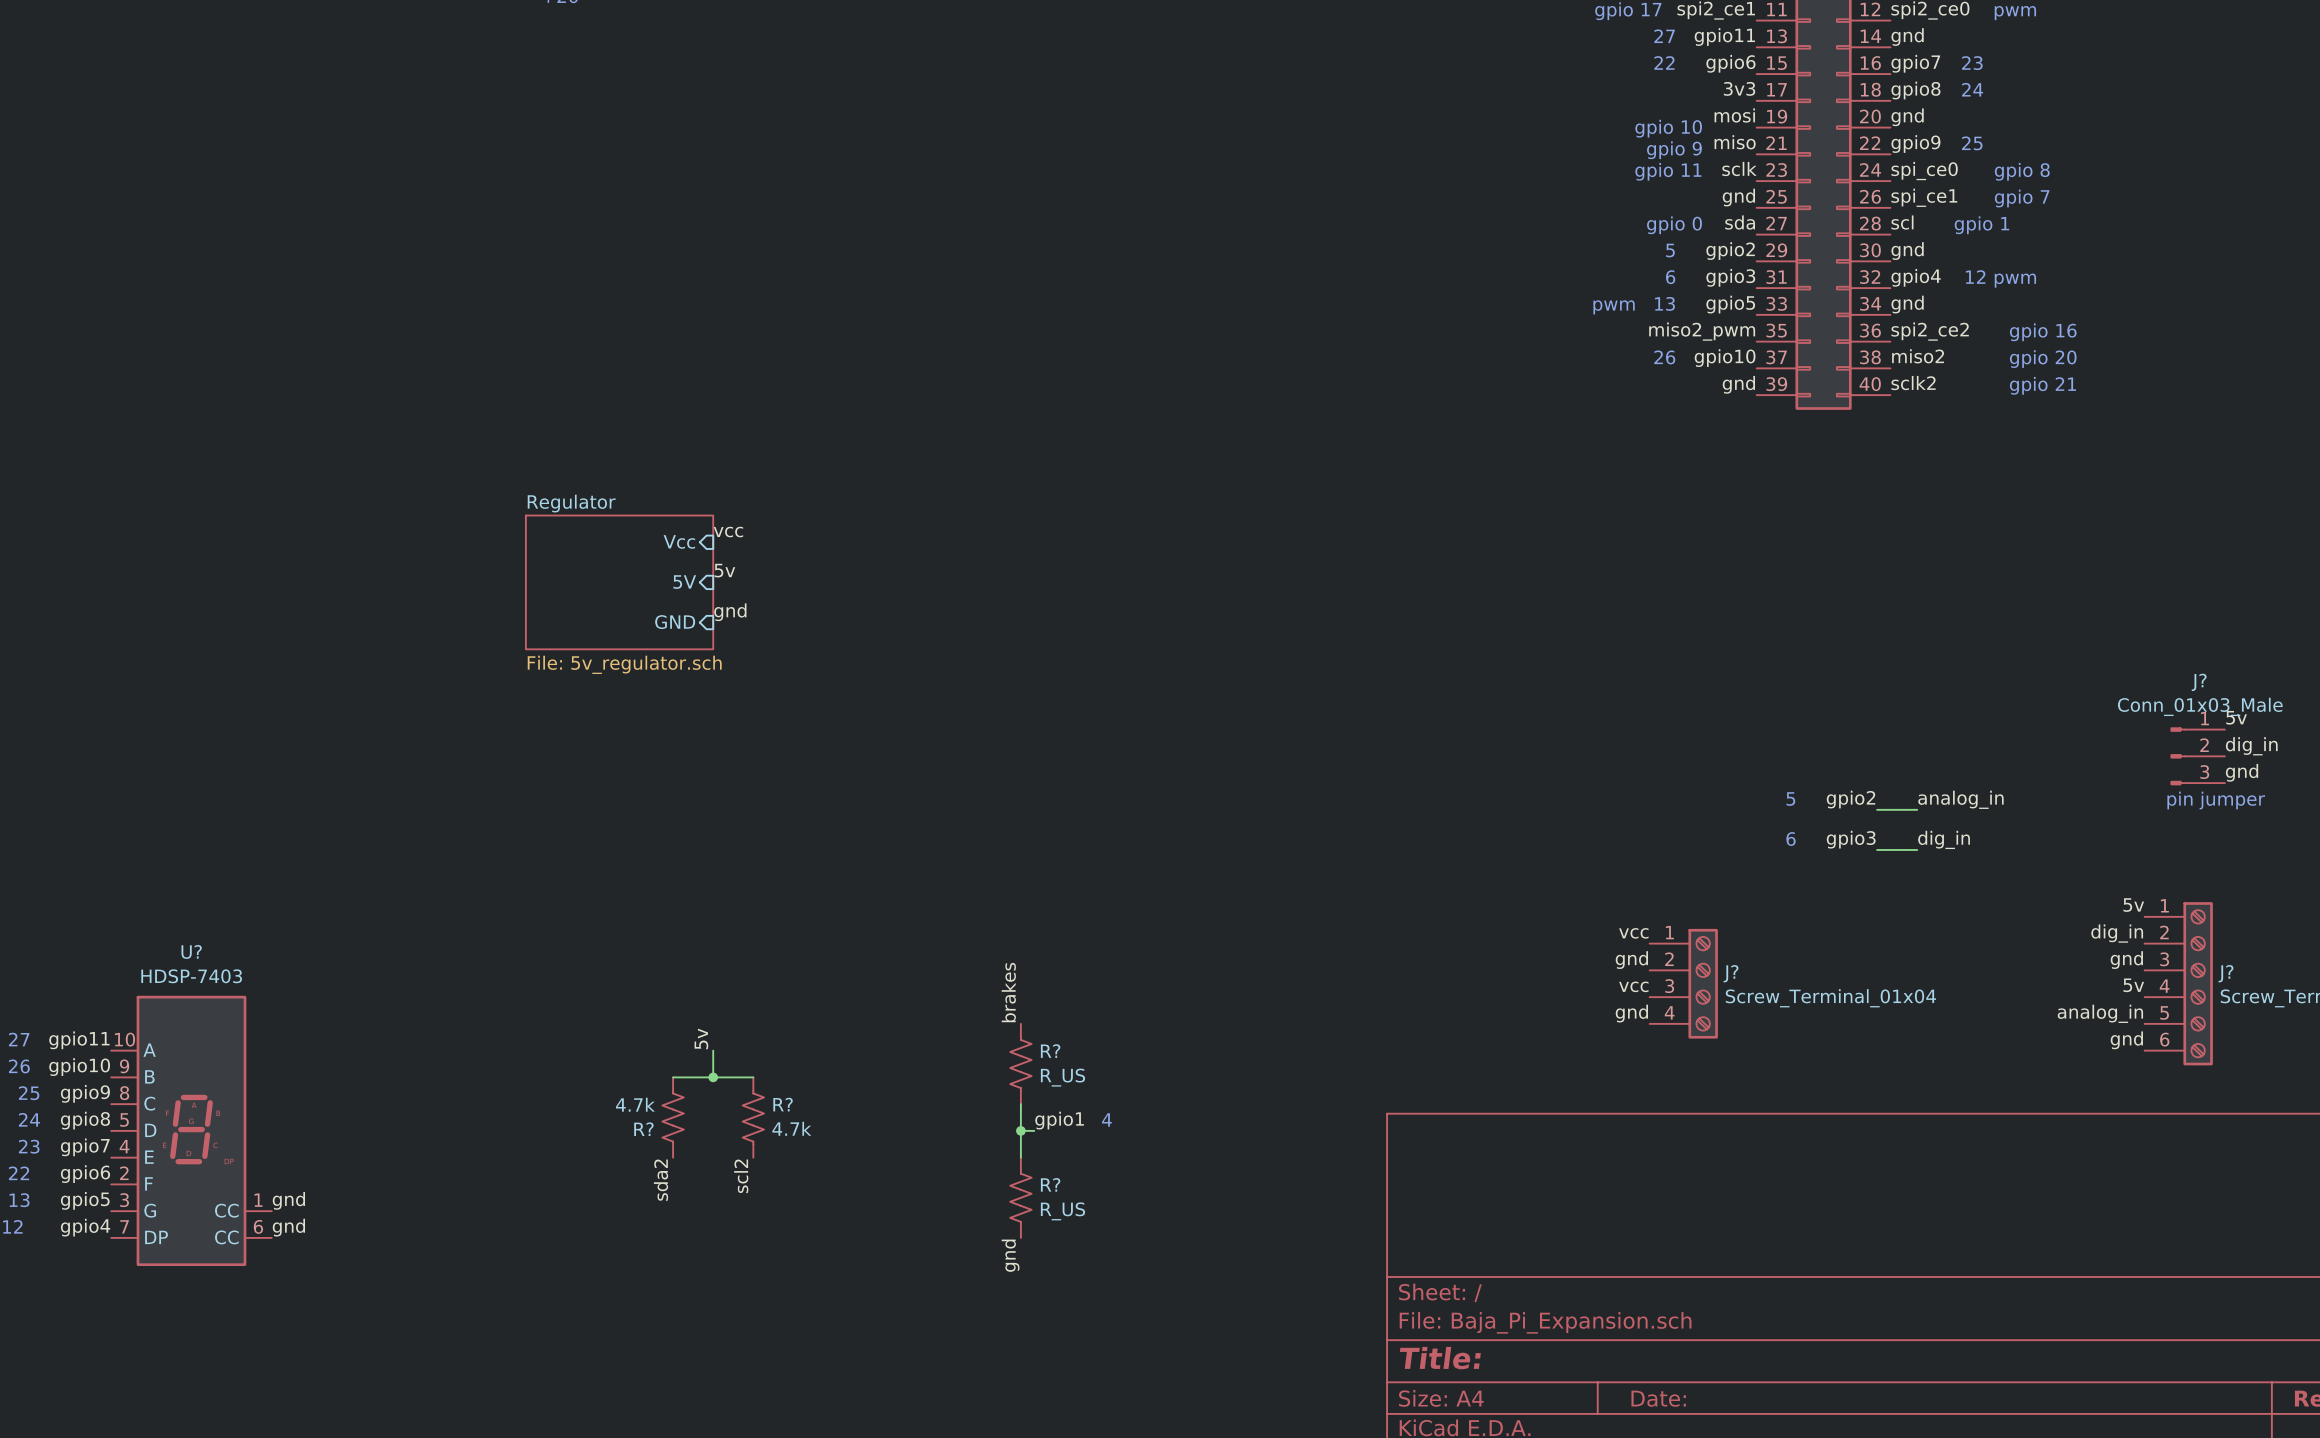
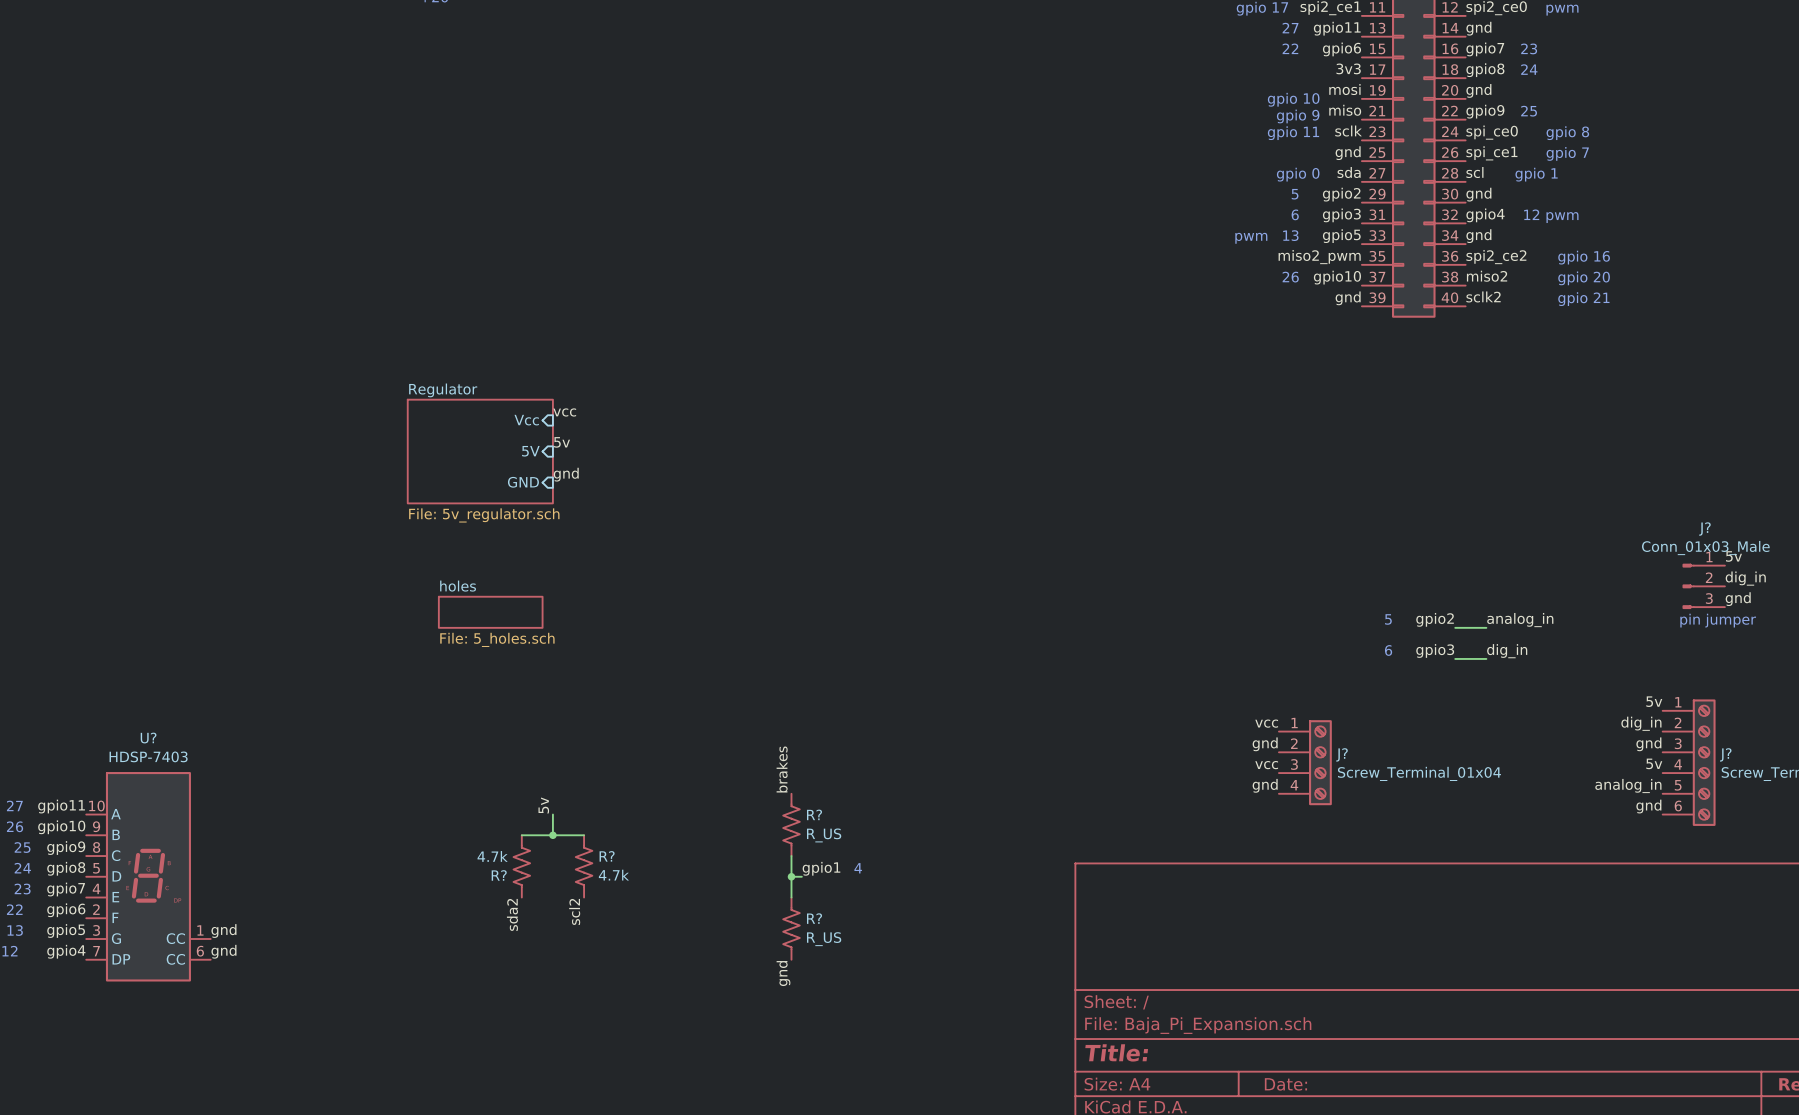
sheet holes: none -> File: 5_holes.sch (490, 612)

